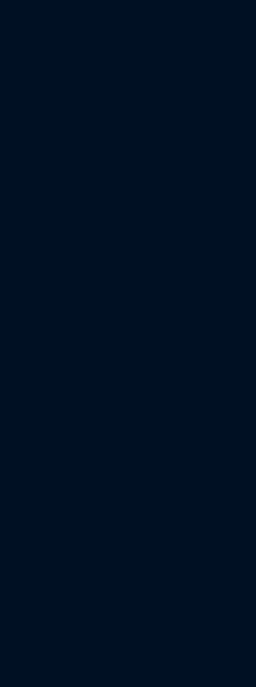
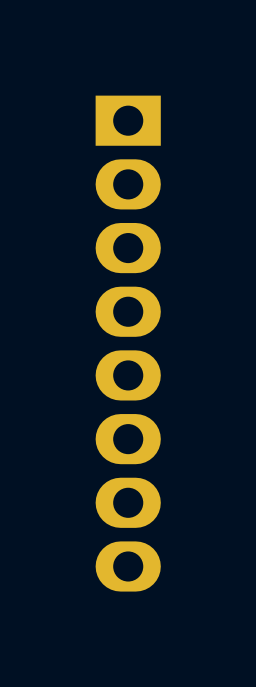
part: none -> (128, 343)

